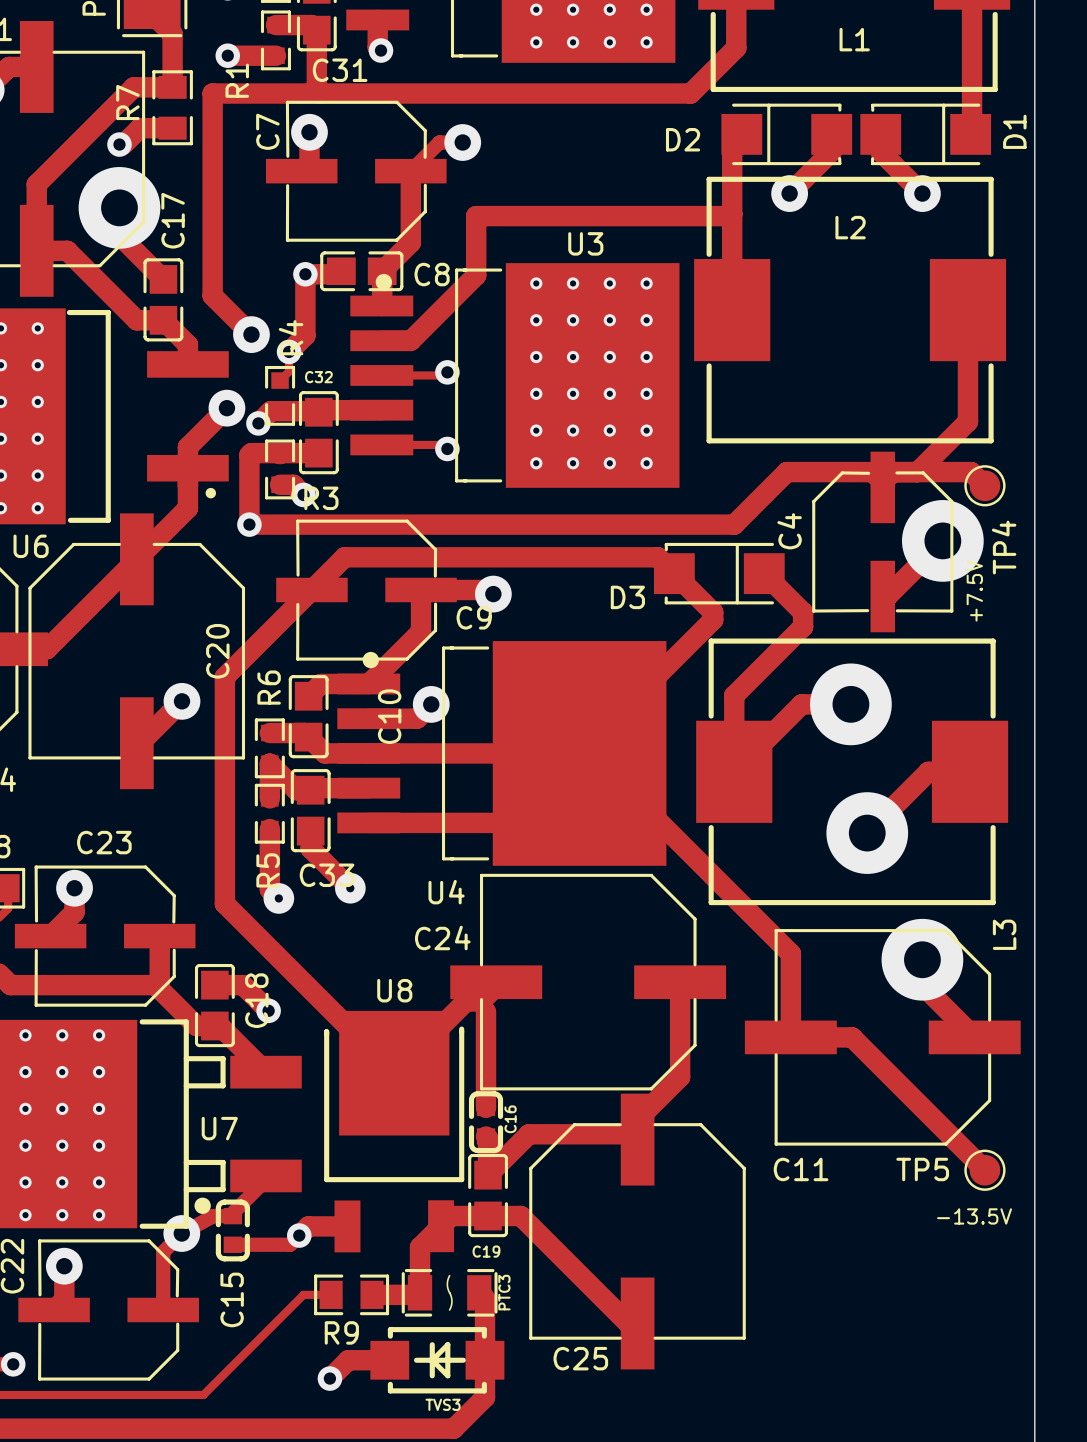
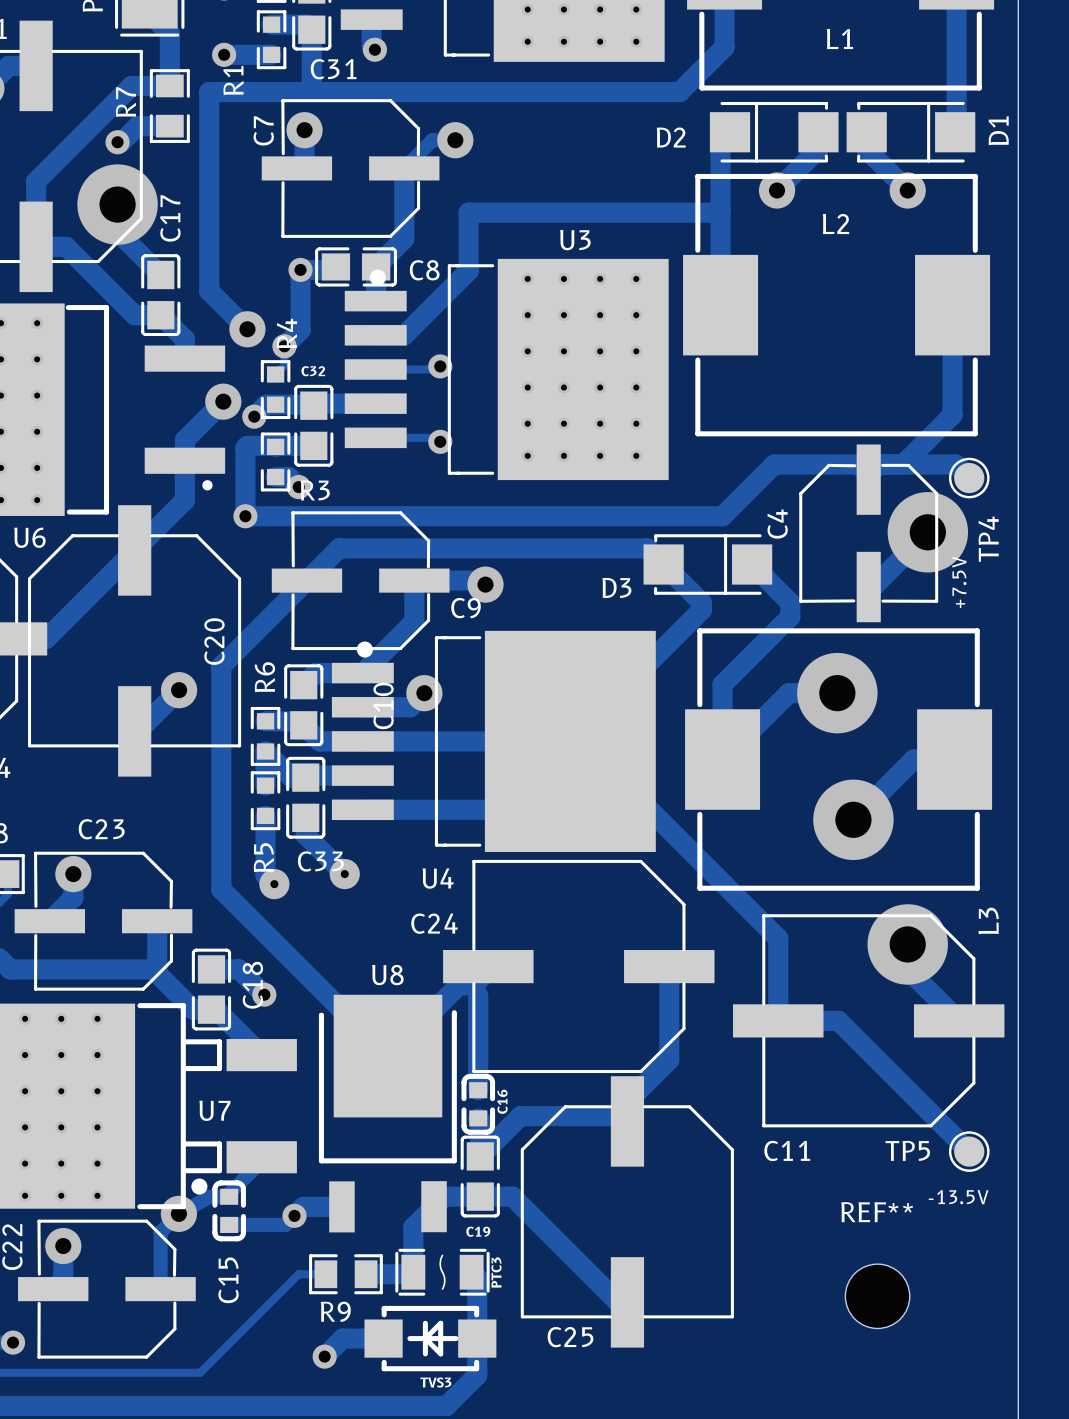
REF**: none -> (877, 1296)

